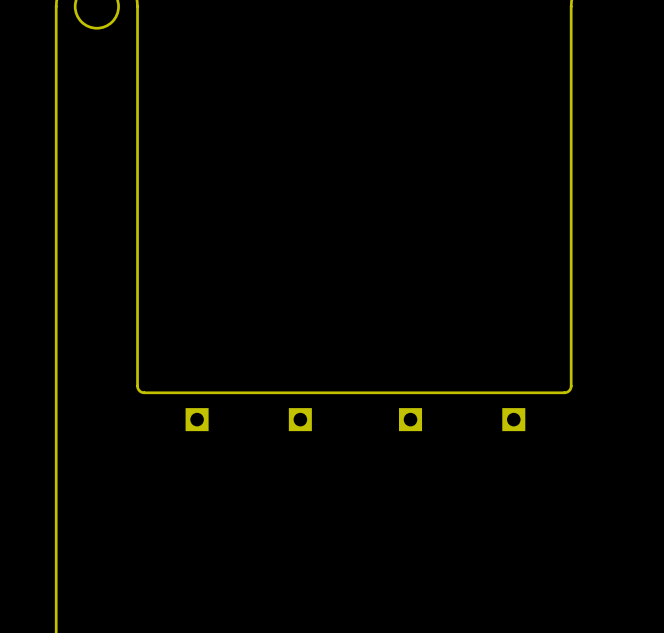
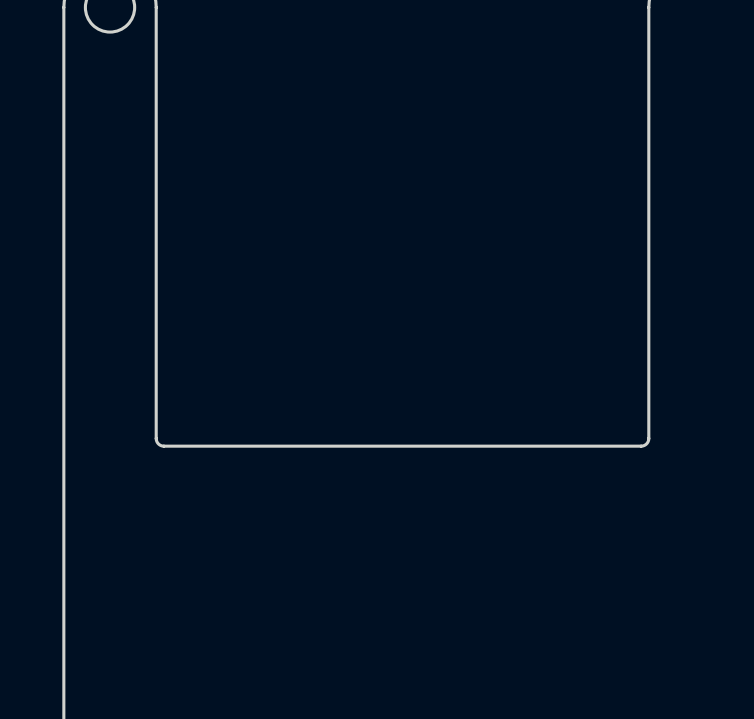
part: (197, 419) -> none
part: (300, 419) -> none
part: (410, 419) -> none
part: (513, 419) -> none

